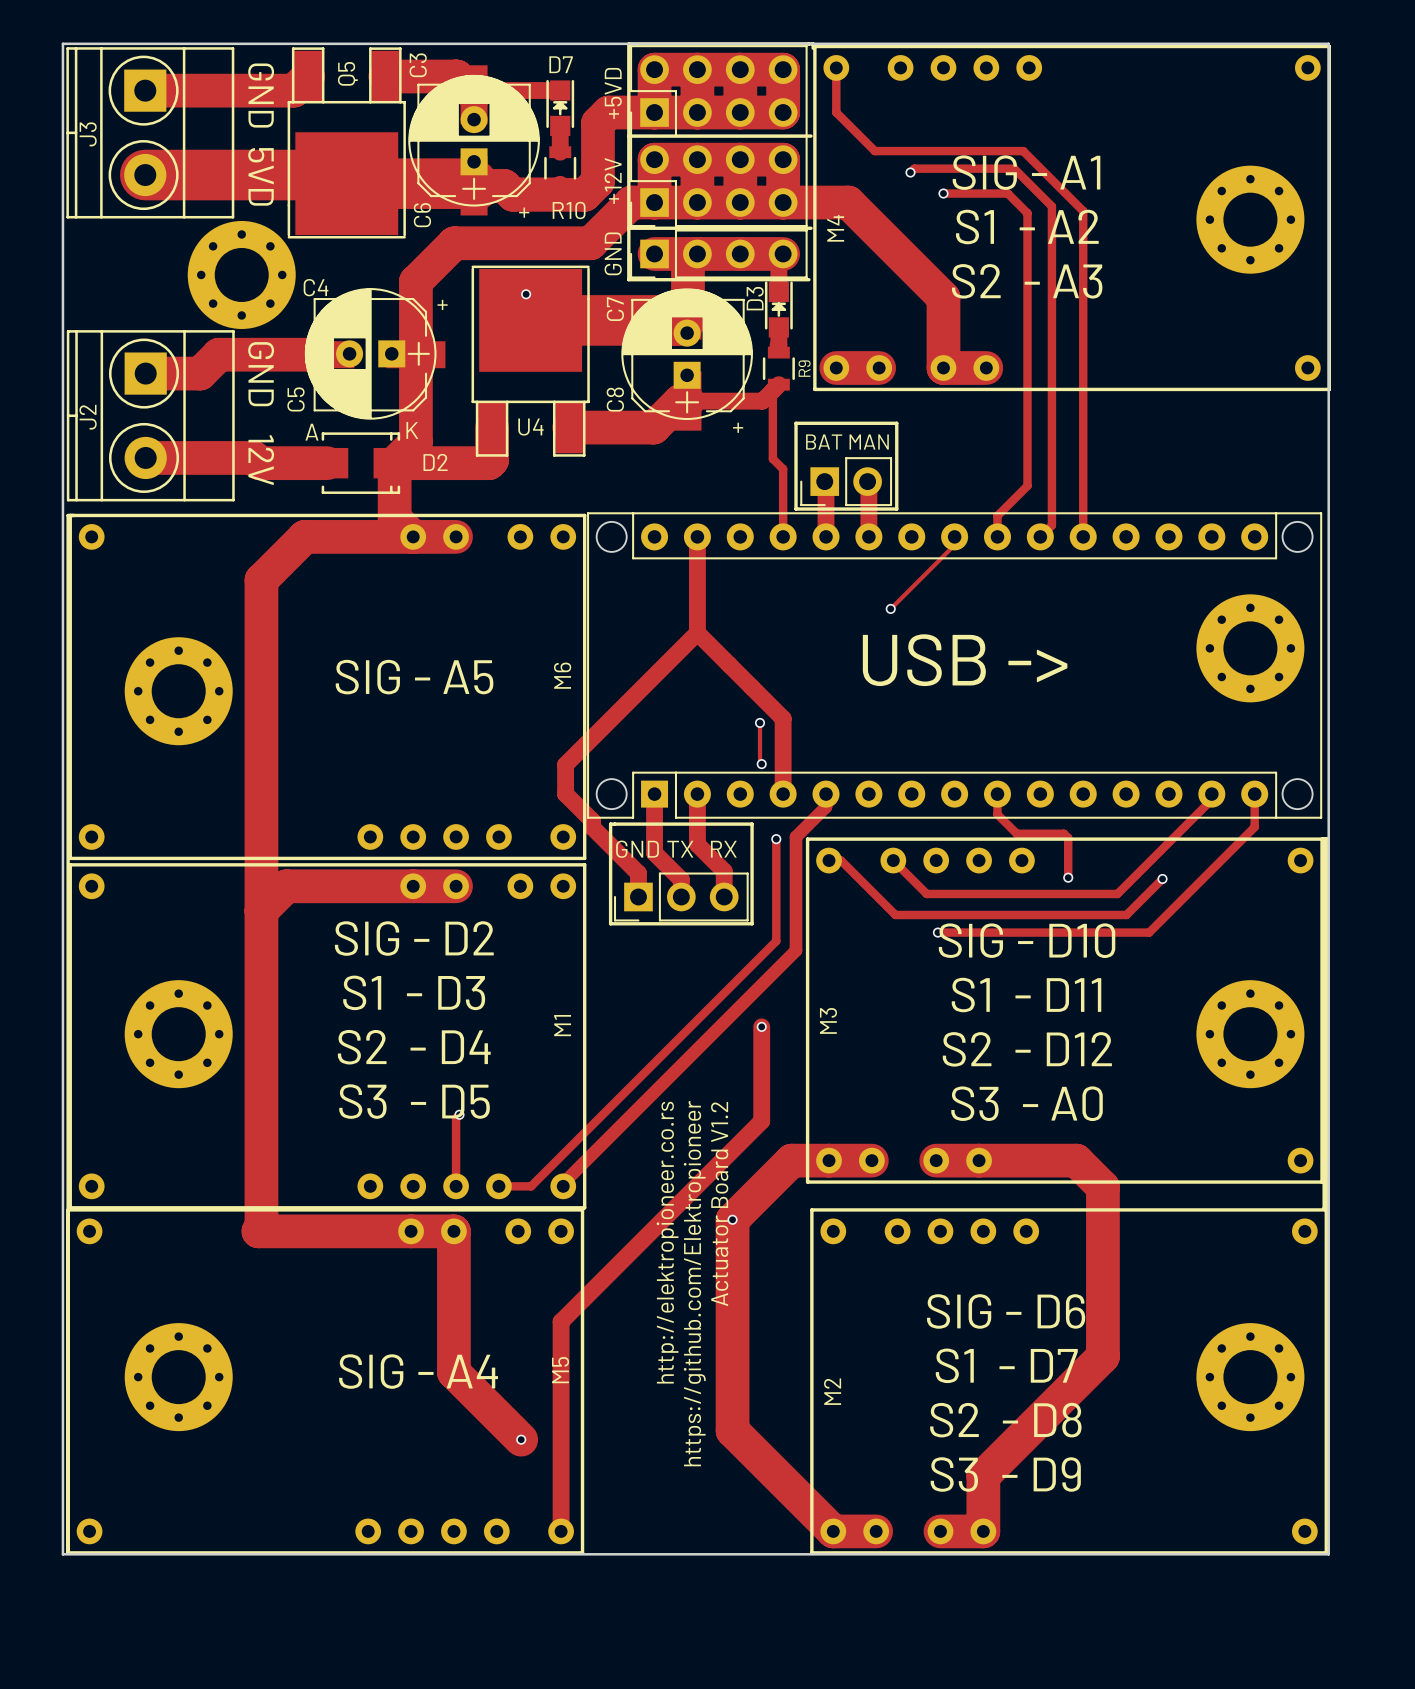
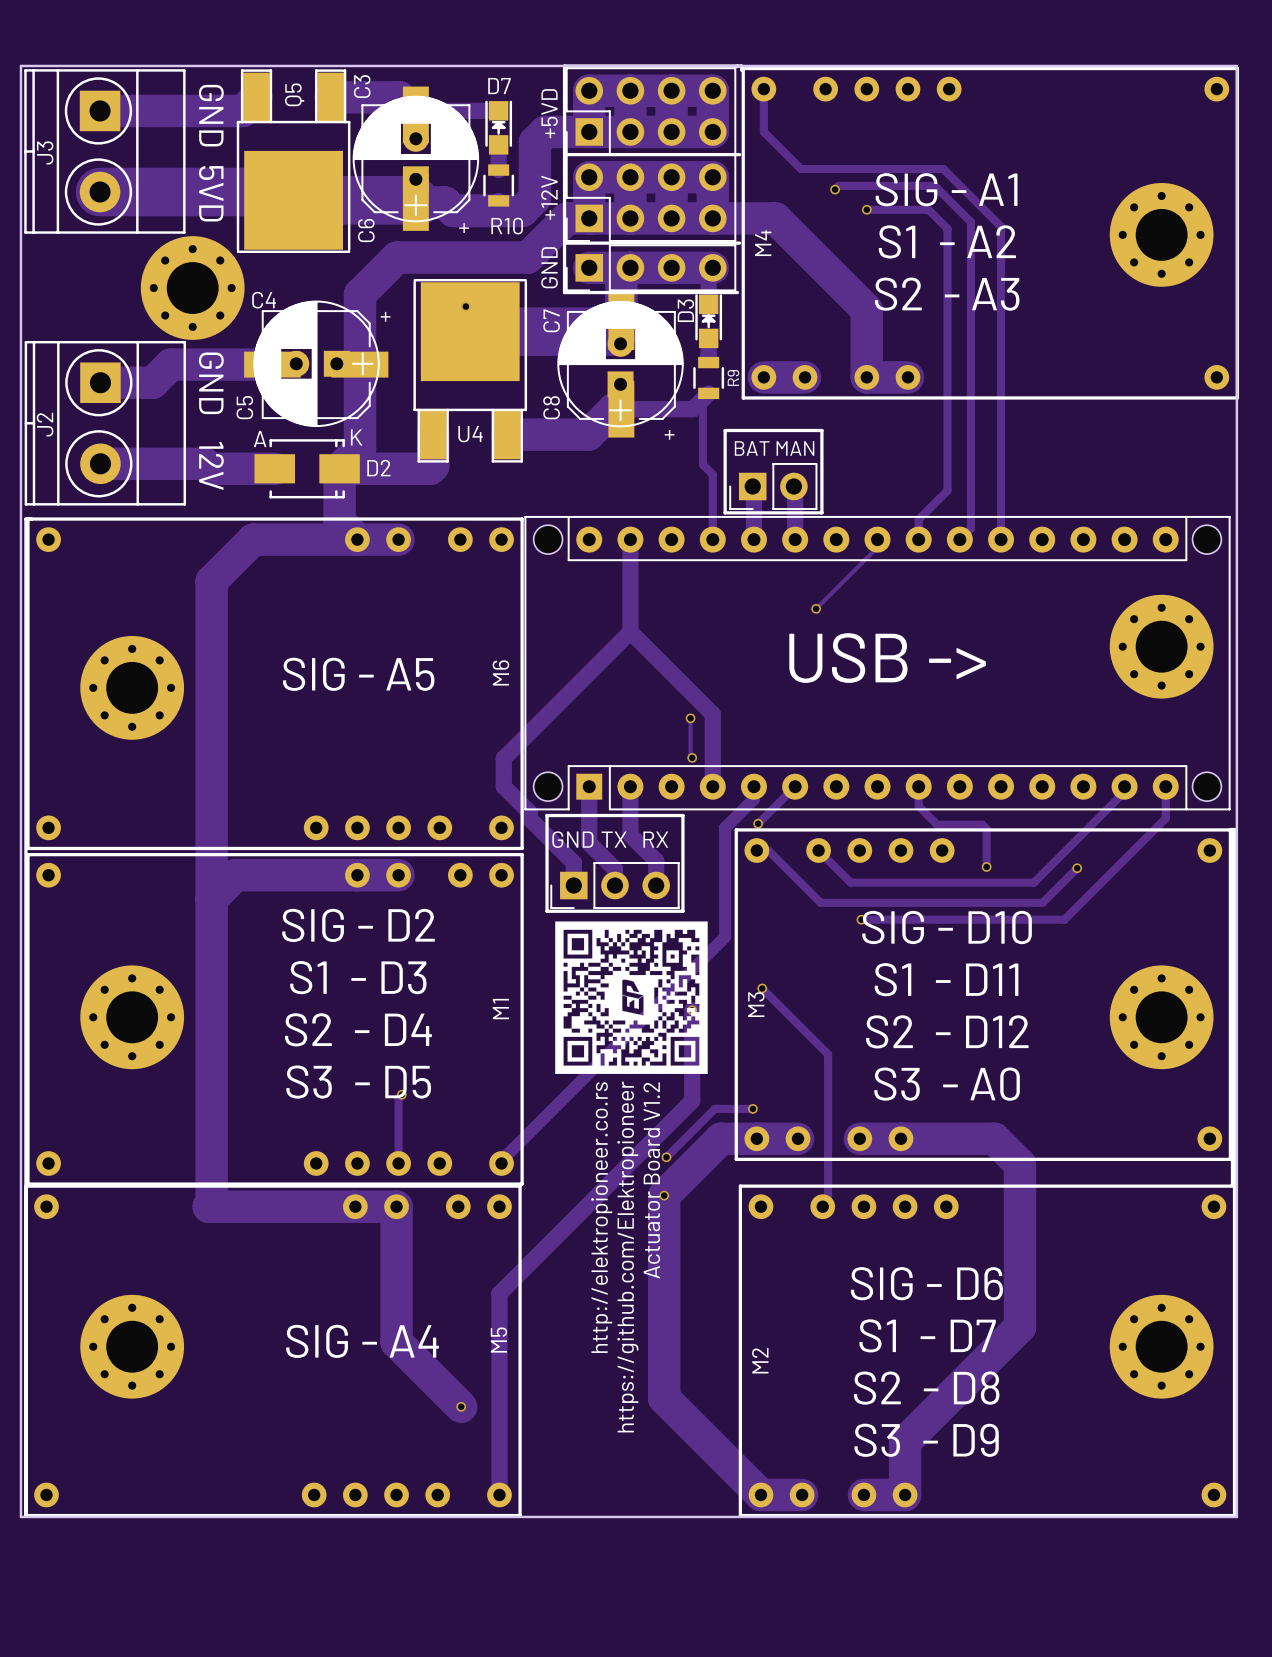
track: none -> (795, 786) (758, 823)
track: (776, 839) (776, 941) (531, 1186) (498, 1186) -> none
via position: (776, 839) -> (758, 823)
drawing: none -> [555, 921, 708, 1075]
track: none -> (762, 988) (828, 1054) (828, 1201) (822, 1206)
via: none -> (762, 988)
track: none -> (752, 1108) (714, 1108) (666, 1157)
via: none -> (752, 1108)
via: none -> (666, 1157)

